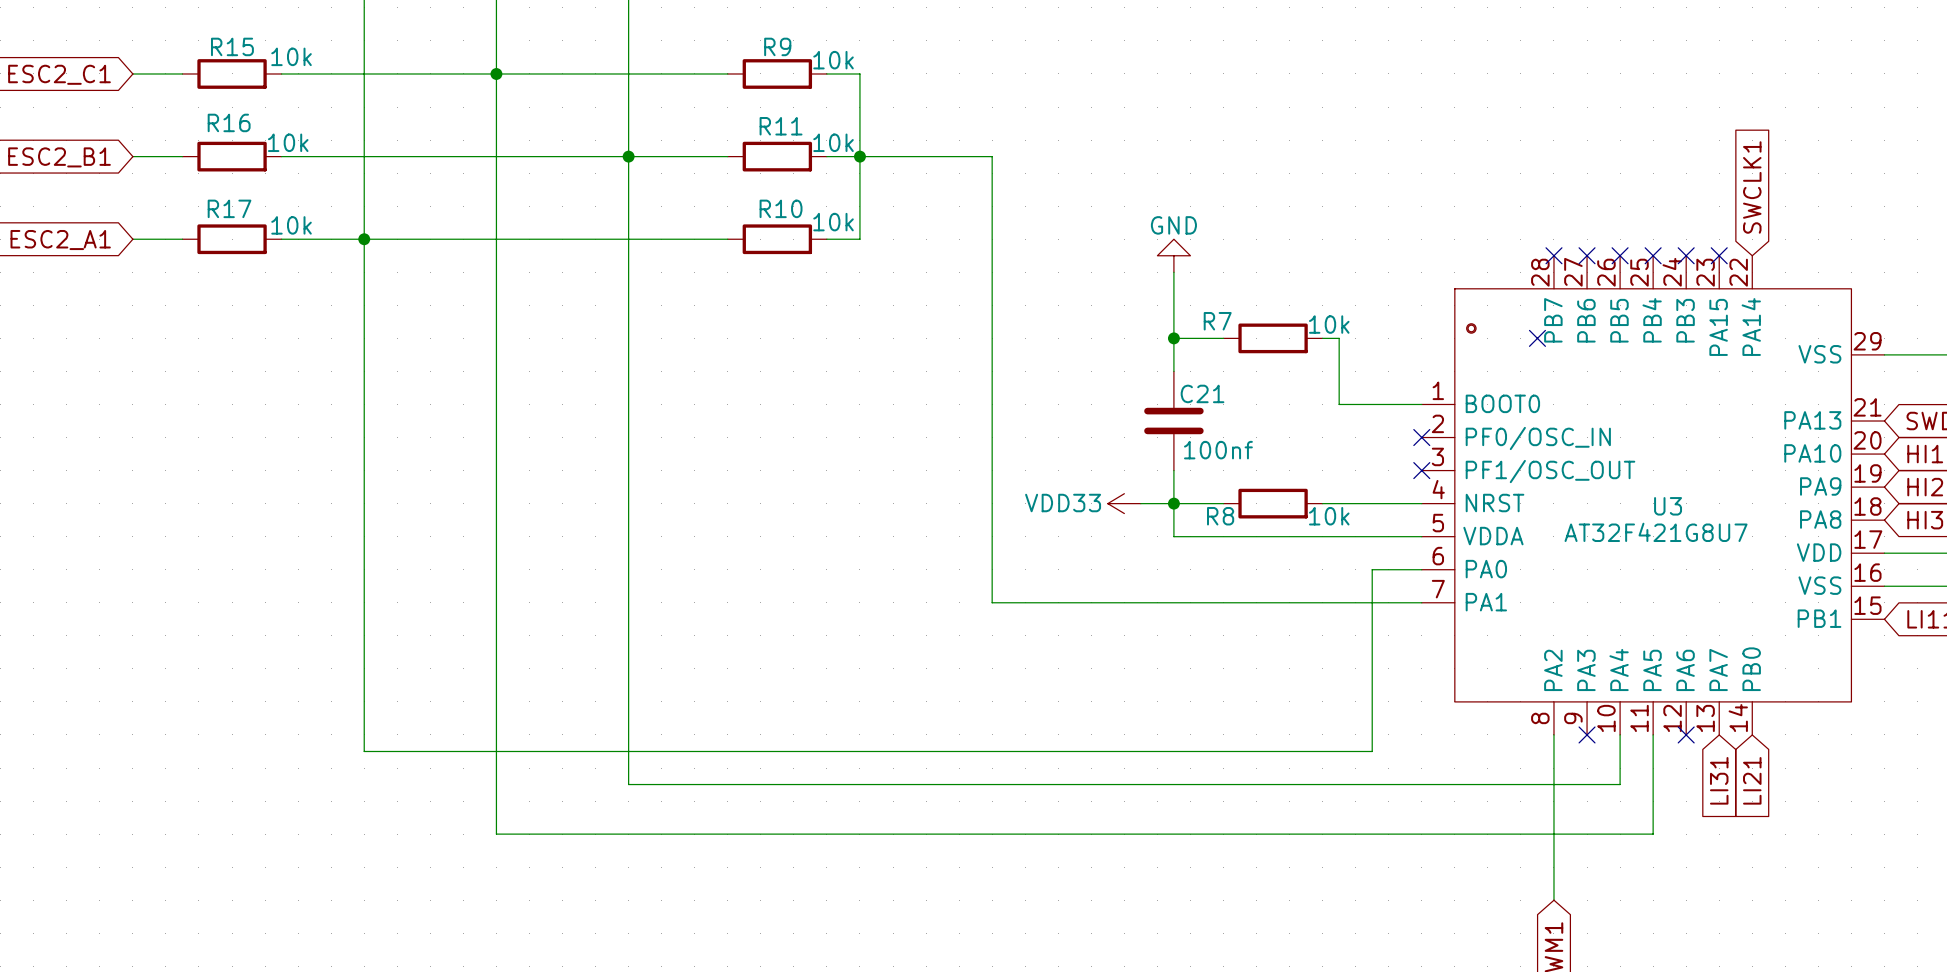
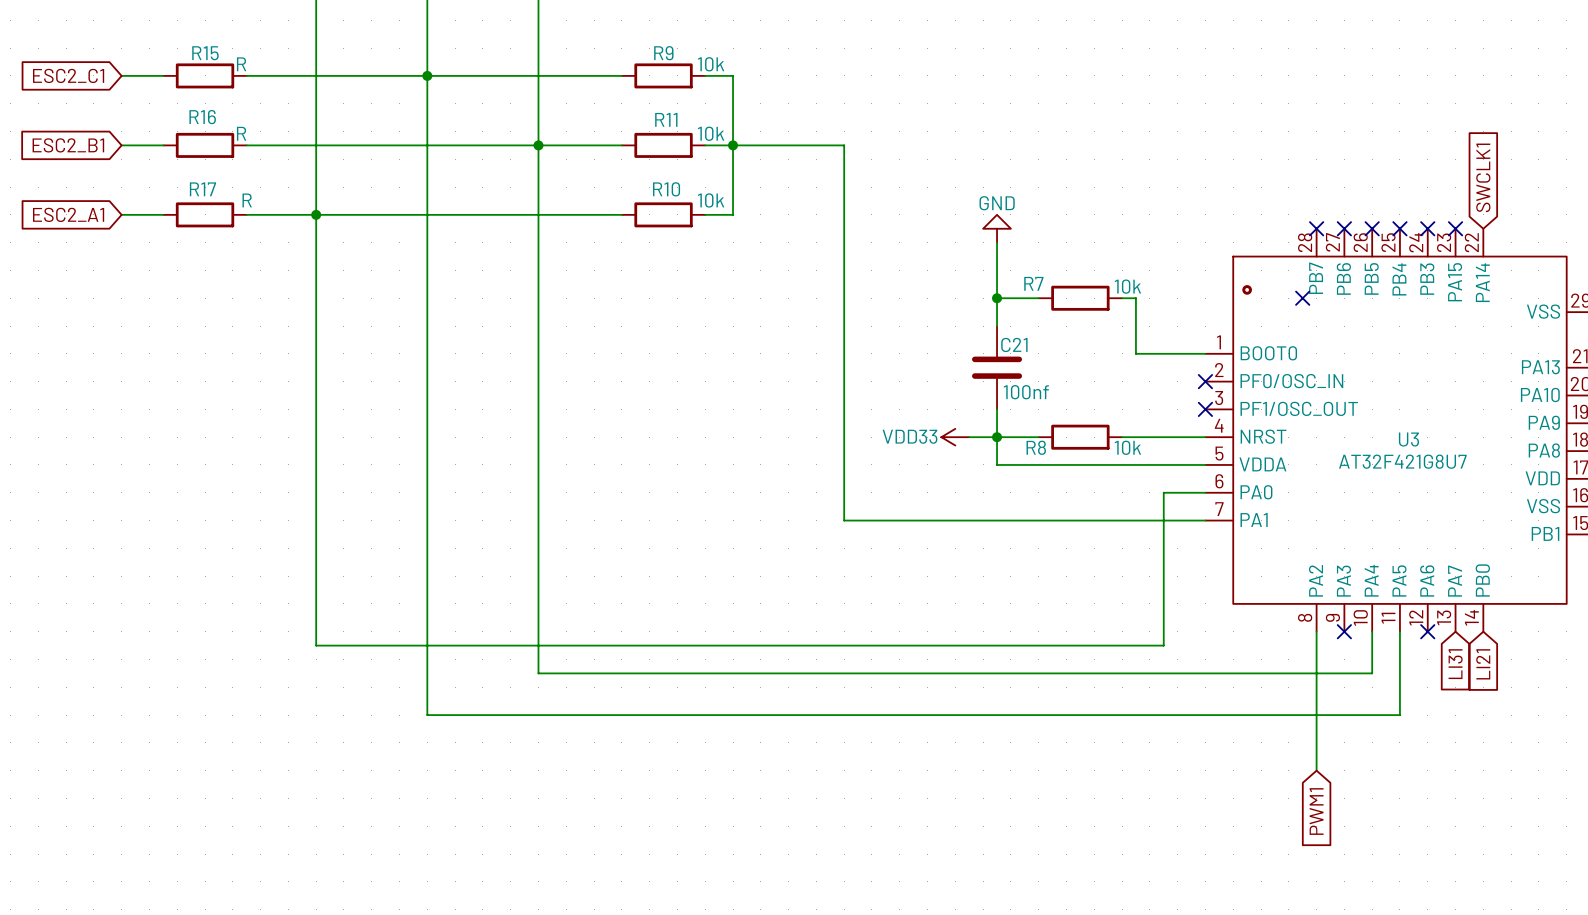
R15 value: 10k (291, 56) -> R (241, 64)
R16 value: 10k (288, 142) -> R (241, 133)
R17 value: 10k (291, 225) -> R (247, 200)

